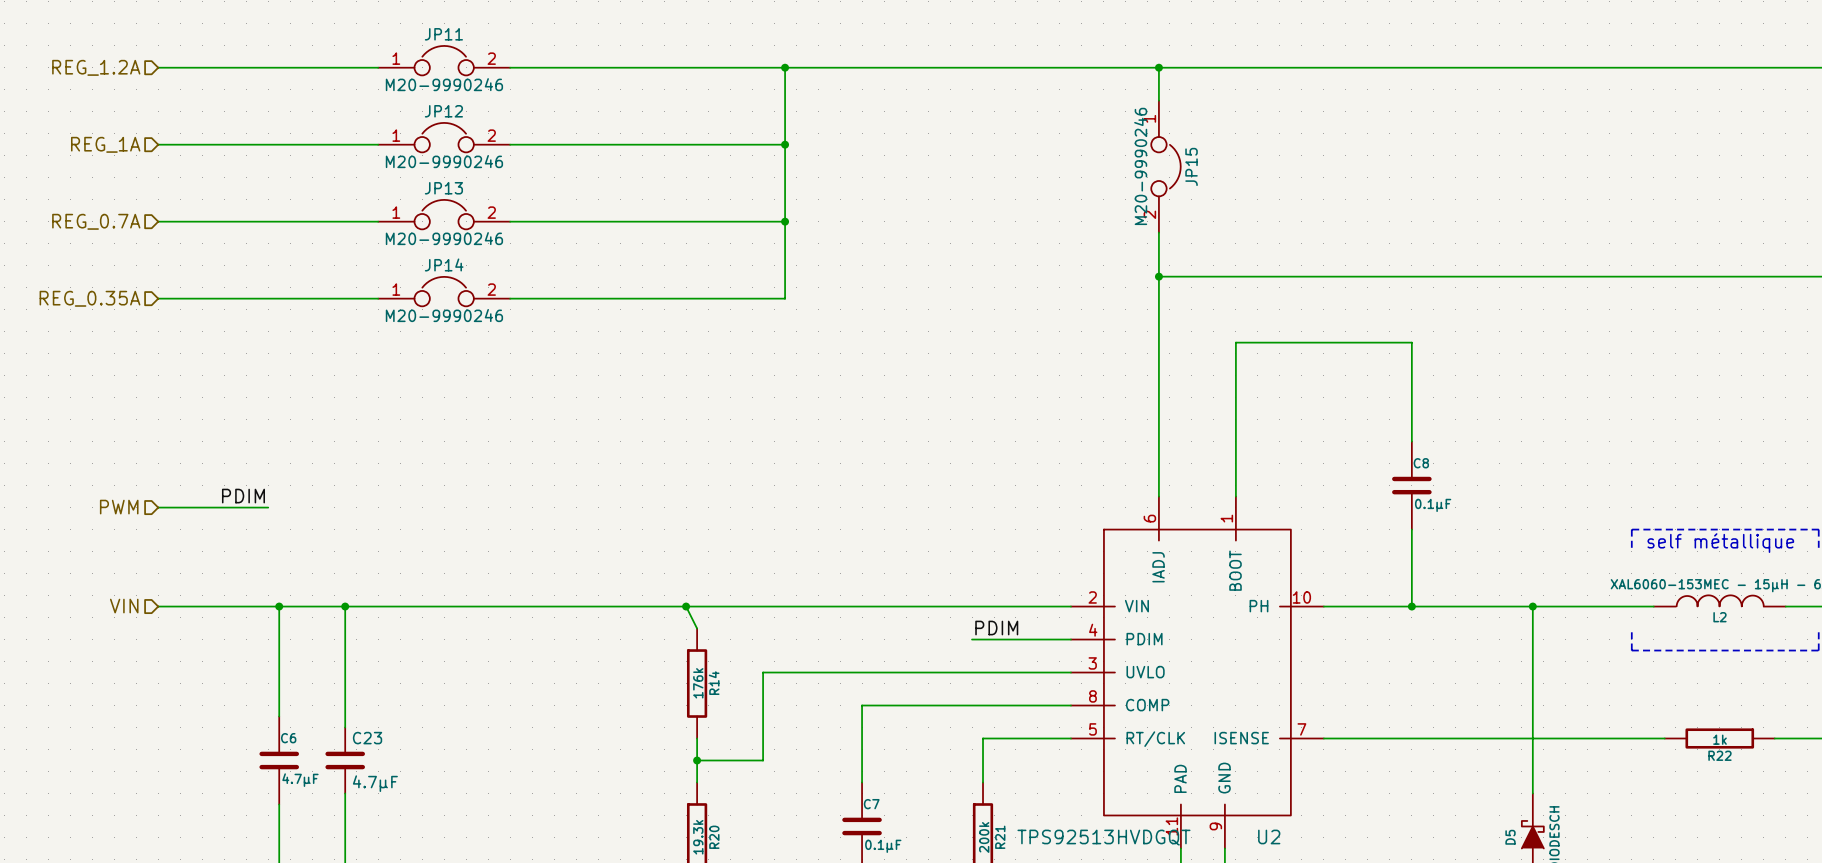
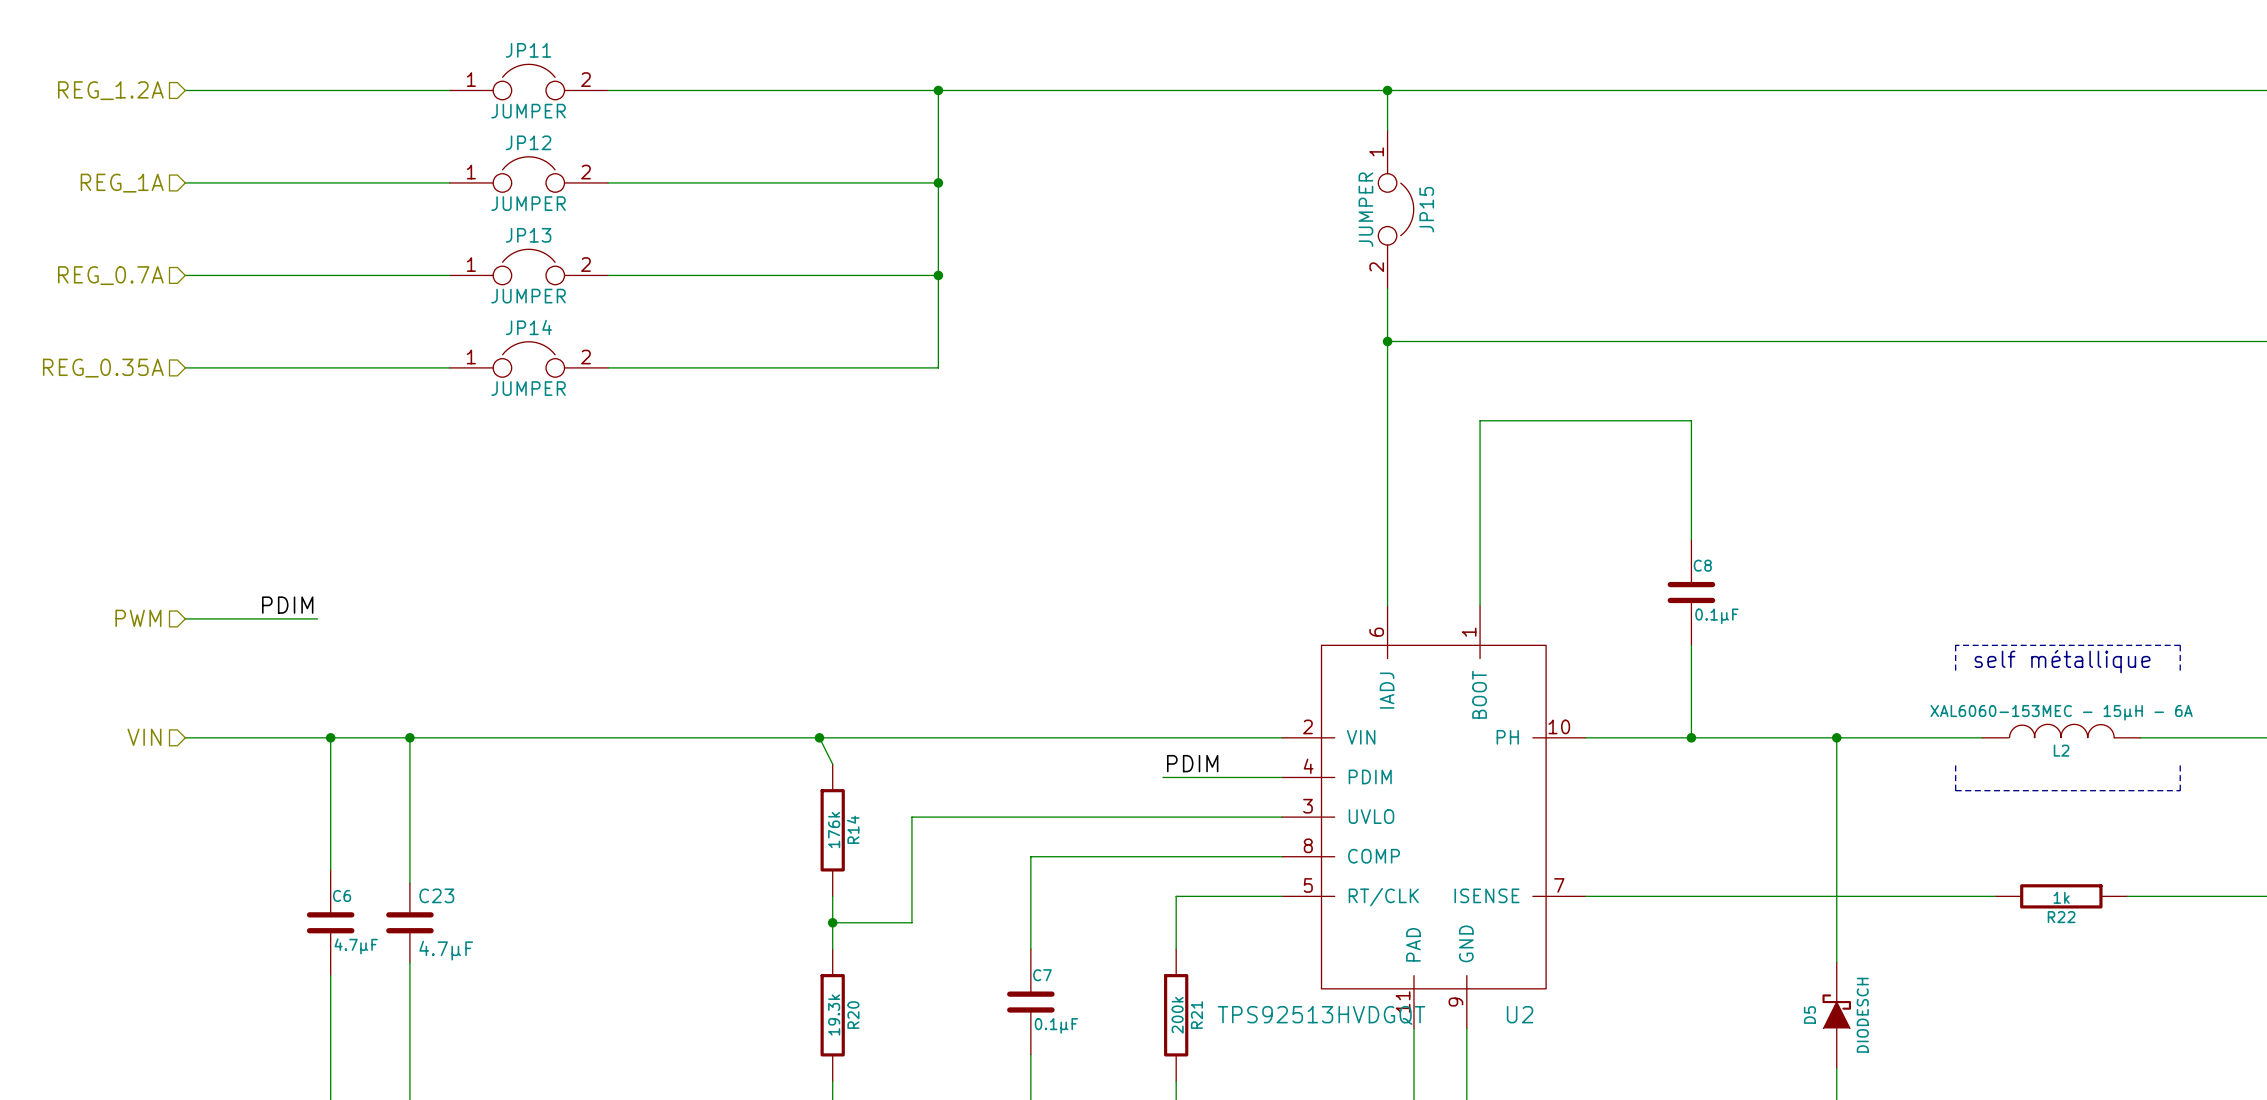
JP11 value: M20-9990246 (444, 84) -> JUMPER (528, 111)
JP12 value: M20-9990246 (444, 161) -> JUMPER (528, 203)
JP15 value: M20-9990246 (1140, 166) -> JUMPER (1365, 209)
JP13 value: M20-9990246 (444, 238) -> JUMPER (528, 296)
JP14 value: M20-9990246 (444, 315) -> JUMPER (528, 388)

